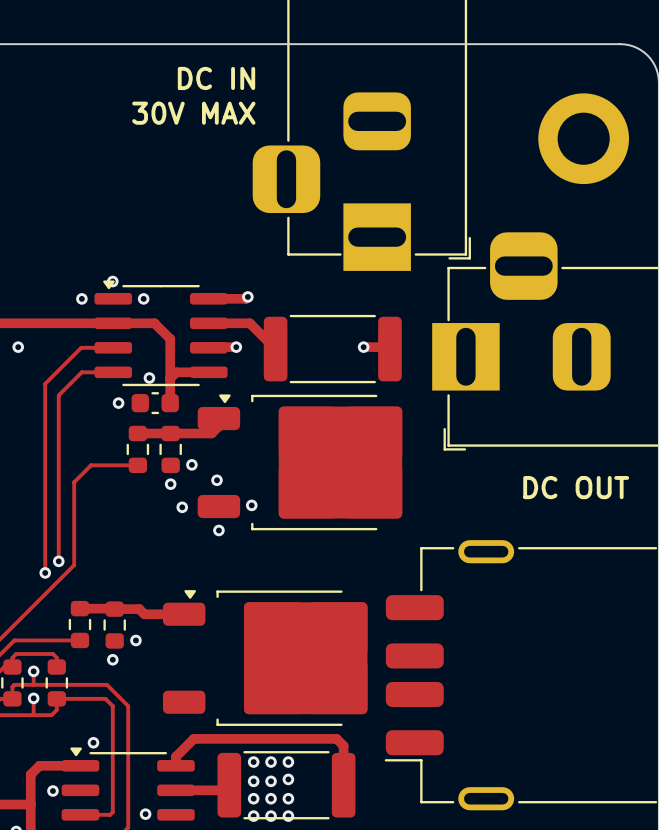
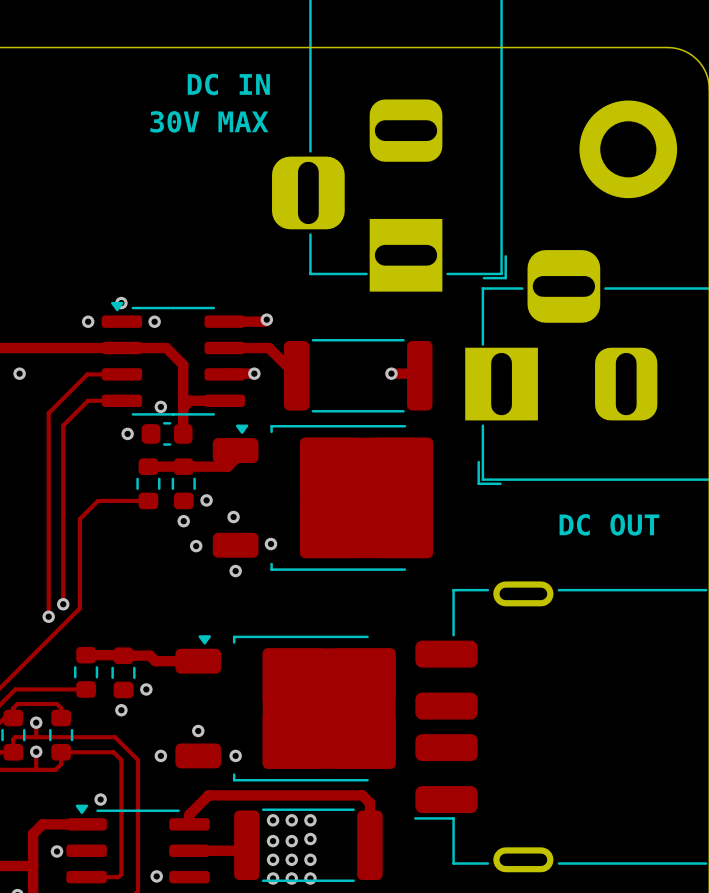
via: none -> (198, 730)
via: none -> (160, 755)
via: none -> (235, 755)

